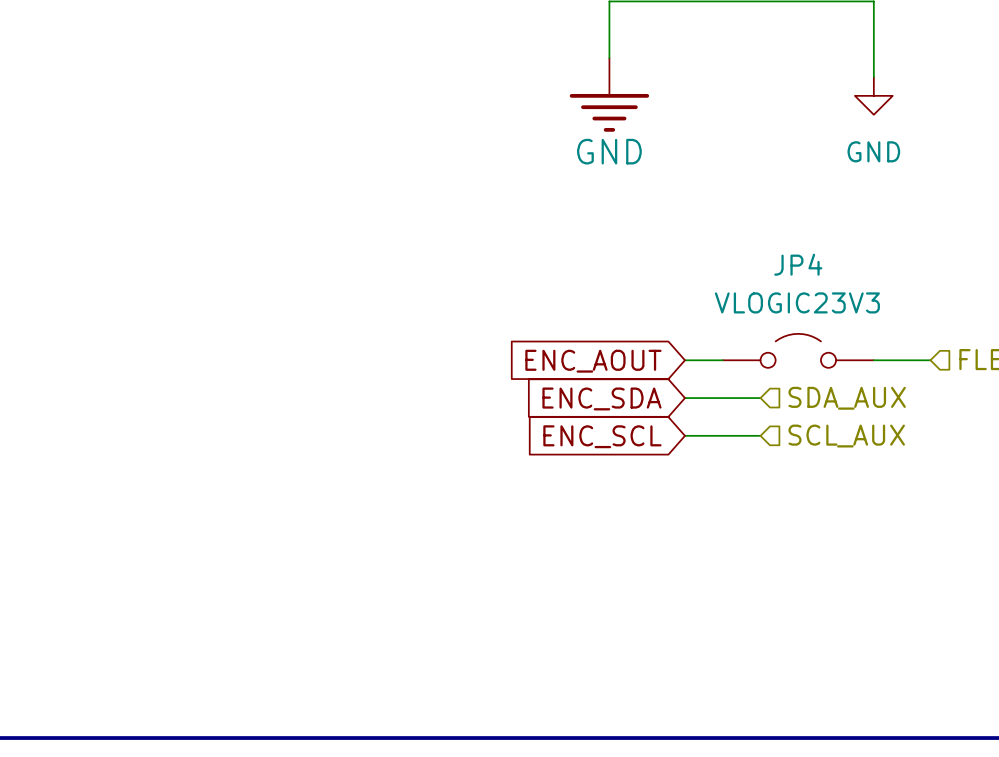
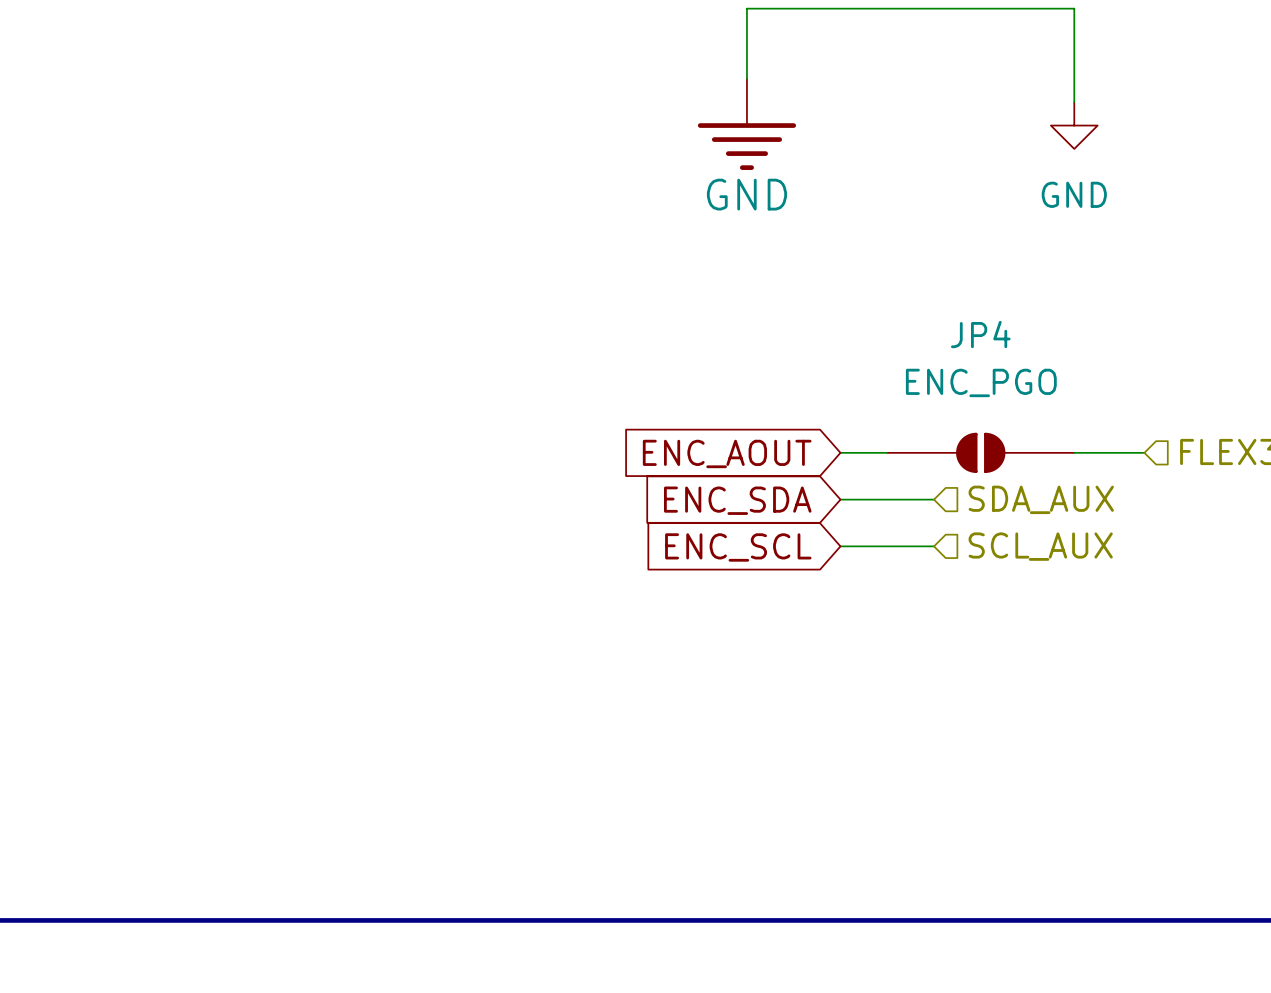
JP4 value: VLOGIC23V3 (797, 302) -> ENC_PGO (981, 382)
JP4 symbol: [722, 333, 874, 368] -> [887, 432, 1075, 473]

